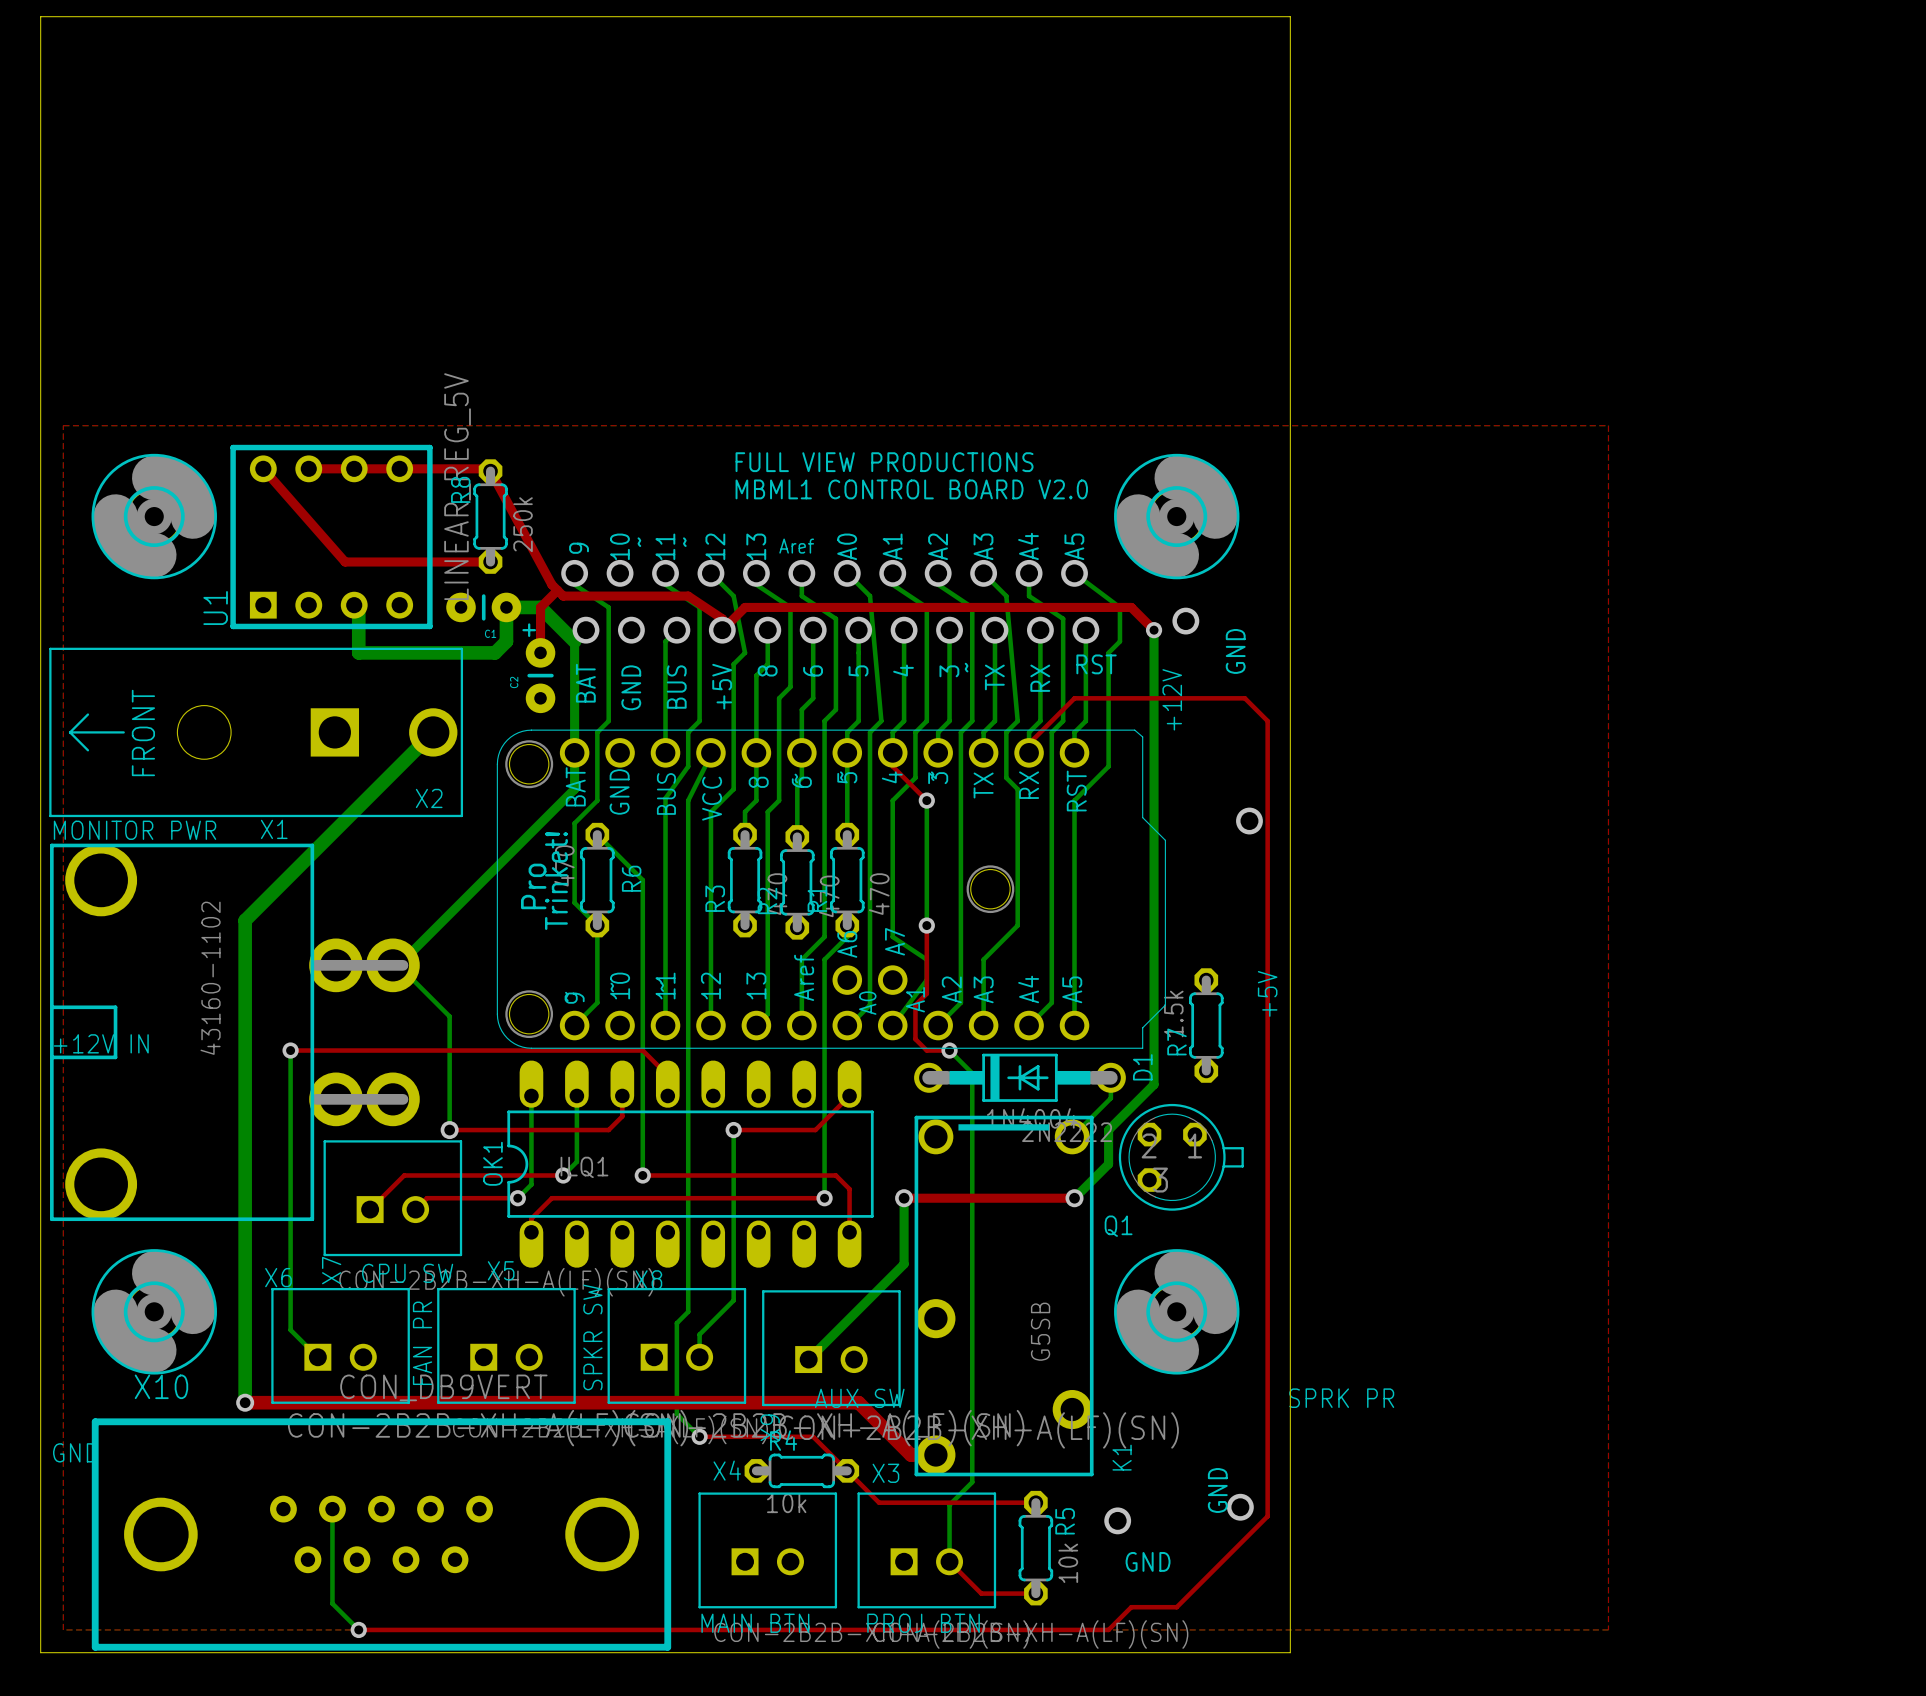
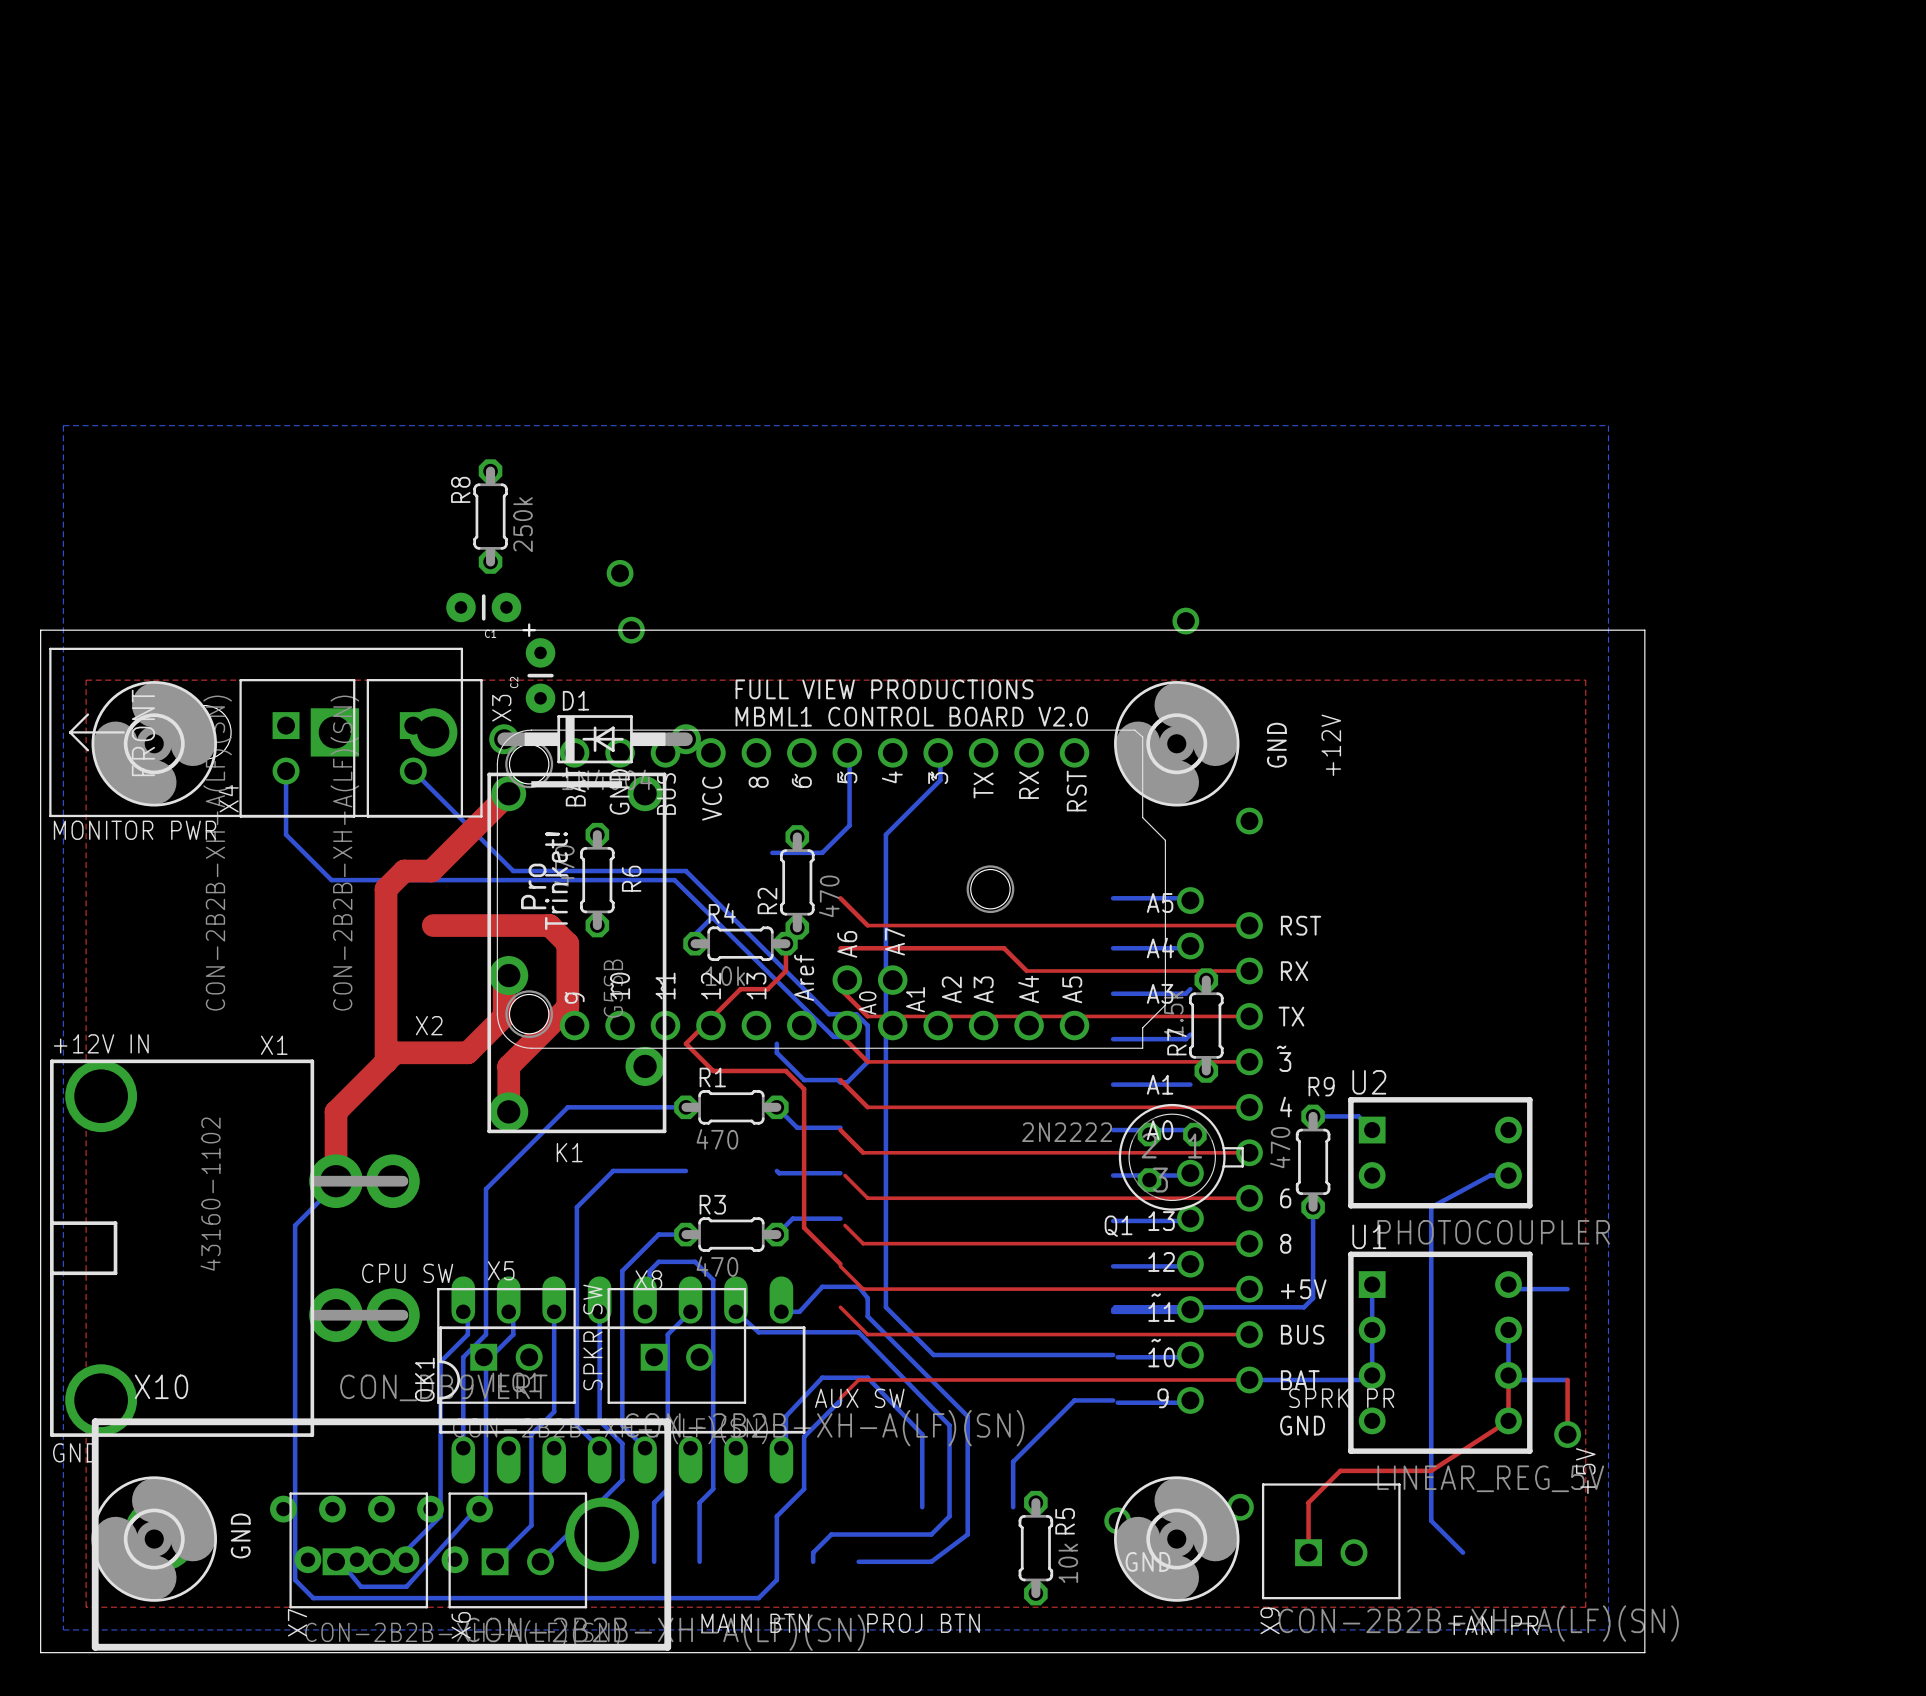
top zone outline: (63, 425) (1608, 425) (1608, 1629) (63, 1629) (63, 425) -> (86, 680) (86, 1607) (1585, 1607) (1585, 680) (86, 680)
text position: FULL VIEW PRODUCTIONS (884, 462) -> FULL VIEW PRODUCTIONS (884, 689)
top track: (263, 468) (345, 562) (490, 562) -> none
top track: (308, 468) (488, 468) (551, 584) (563, 596) (688, 596) (722, 618) (722, 630) (745, 607) (1131, 607) (1154, 630) -> none
text position: MBML1 CONTROL BOARD V2.0 (911, 489) -> MBML1 CONTROL BOARD V2.0 (911, 716)
part position: (154, 516) -> (154, 743)
part position: (1176, 516) -> (1176, 743)
U1 rotation: 0° (331, 537) -> 90° clockwise (1440, 1352)
U1 position: (331, 537) -> (1440, 1352)
text: ~ (639, 542) -> none
text: ~ (684, 542) -> none
text: 10 (619, 546) -> none
text: 11 (665, 546) -> none
text: 12 (715, 546) -> none
text: 13 (756, 546) -> none
text: Aref (796, 546) -> none
text: A0 (847, 546) -> none
text: A1 (892, 546) -> none
text: A2 (938, 546) -> none
text: A3 (983, 546) -> none
text: A4 (1028, 546) -> none
text rotation: 0° (1074, 546) -> 90° clockwise (1160, 902)
text position: A5 (1074, 546) -> A5 (1160, 902)
text: 9 (579, 548) -> none
bottom track: (665, 562) (665, 584) (699, 607) (699, 721) (688, 732) (688, 766) (665, 798) (665, 1025) -> none
bottom track: (574, 573) (574, 584) (608, 607) (608, 721) (597, 732) (597, 800) (574, 823) (574, 902) (597, 925) (597, 1002) (574, 1025) -> none
via: (574, 573) -> none
via: (665, 573) -> none
bottom track: (710, 573) (733, 596) (745, 652) (733, 664) (733, 789) (710, 811) (710, 1025) -> none
via: (710, 573) -> none
bottom track: (756, 573) (756, 584) (790, 607) (790, 686) (779, 698) (779, 800) (767, 811) (767, 1014) (756, 1025) -> none
via: (756, 573) -> none
bottom track: (801, 573) (801, 596) (835, 618) (835, 709) (824, 721) (824, 936) (801, 959) (801, 1025) -> none
via: (801, 573) -> none
bottom track: (847, 573) (870, 596) (881, 721) (870, 732) (870, 1005) (849, 1025) (847, 1025) -> none
via: (847, 573) -> none
bottom track: (892, 573) (892, 584) (926, 607) (926, 721) (915, 732) (915, 777) (892, 800) (892, 936) (926, 959) (926, 980) (892, 1025) -> none
via: (892, 573) -> none
bottom track: (938, 573) (938, 584) (972, 607) (972, 721) (960, 732) (960, 1002) (938, 1025) -> none
via: (938, 573) -> none
bottom track: (983, 573) (1006, 596) (1017, 721) (1006, 732) (1006, 777) (1017, 789) (1017, 925) (983, 959) (983, 1025) -> none
via: (983, 573) -> none
bottom track: (1029, 573) (1029, 596) (1063, 618) (1063, 721) (1051, 732) (1051, 1002) (1029, 1025) -> none
via: (1029, 573) -> none
bottom track: (1074, 573) (1119, 607) (1119, 641) (1108, 652) (1108, 766) (1074, 800) (1074, 1025) -> none
via: (1074, 573) -> none
top track: (557, 590) (540, 607) (540, 652) -> none
bottom track: (354, 605) (358, 609) (358, 652) (495, 652) (506, 641) (506, 607) (540, 607) (574, 641) -> none
board edge: (40, 630) (40, 16) (1290, 16) (1290, 1652) -> (40, 630) (1644, 630) (1644, 1652) (1290, 1652)
via: (585, 630) -> none
bottom track: (676, 630) (665, 641) (665, 752) -> none
via: (676, 630) -> none
via: (722, 630) -> none
bottom track: (767, 630) (767, 664) (756, 675) (756, 800) (745, 811) (745, 834) -> none
via: (767, 630) -> none
bottom track: (813, 630) (813, 698) (801, 709) (801, 777) (797, 782) (797, 836) -> none
via: (813, 630) -> none
bottom track: (858, 630) (858, 721) (847, 732) (847, 834) -> none
via: (858, 630) -> none
bottom track: (904, 630) (904, 721) (892, 732) (892, 752) -> none
via: (904, 630) -> none
bottom track: (949, 630) (949, 721) (938, 732) (938, 752) -> none
via: (949, 630) -> none
bottom track: (994, 630) (994, 721) (983, 732) (983, 752) -> none
via: (994, 630) -> none
bottom track: (1040, 630) (1040, 721) (1029, 732) (1029, 752) -> none
via: (1040, 630) -> none
bottom track: (1085, 630) (1085, 721) (1074, 732) (1074, 752) -> none
via: (1085, 630) -> none
bottom track: (1154, 630) (1154, 1084) (1108, 1130) (1108, 1164) (1074, 1198) -> none
via: (1154, 630) -> none
bottom track: (574, 641) (574, 789) (398, 965) -> none
text position: GND (1235, 651) -> GND (1276, 745)
text position: RST (1096, 664) -> RST (1301, 925)
text: ~ (966, 667) -> none
text: 8 (767, 670) -> none
text: 6 (813, 670) -> none
text: 5 (858, 670) -> none
text: 4 (903, 670) -> none
text: 3 (949, 671) -> none
text: TX (994, 677) -> none
text rotation: 0° (1040, 678) -> 90° clockwise (1294, 971)
text position: RX (1040, 678) -> RX (1294, 971)
text: BAT (585, 683) -> none
text: +5V (722, 686) -> none
text: GND (631, 687) -> none
text: BUS (676, 687) -> none
text position: +12V (1172, 699) -> +12V (1331, 745)
bottom track: (433, 732) (245, 920) (245, 1402) -> none
bottom track: (710, 752) (688, 800) (688, 1311) (676, 1323) (676, 1414) (699, 1436) -> none
top track: (892, 752) (892, 766) (926, 800) -> none
top track: (1029, 752) (1029, 743) (1074, 698) (1244, 698) (1267, 721) (1267, 1516) (1176, 1607) (1131, 1607) (1108, 1629) (358, 1629) -> none
bottom track: none -> (849, 761) (849, 825) (822, 852) (772, 852)
bottom track: none -> (940, 761) (940, 780) (885, 834) (885, 1307) (933, 1355) (1113, 1355)
bottom track: none -> (286, 771) (286, 834) (331, 880) (674, 880) (833, 1036) (840, 1036)
bottom track: none -> (413, 771) (513, 871) (685, 871) (829, 1014) (856, 1014) (867, 1025) (867, 1061) (847, 1082) (840, 1082) (838, 1080) (804, 1080) (776, 1052) (776, 1043)
top track: none -> (508, 793) (431, 871) (404, 871) (386, 889) (386, 1061)
text position: X2 (429, 798) -> X2 (429, 1025)
bottom track: (926, 800) (926, 925) -> none
via: (926, 800) -> none
bottom track: (597, 834) (642, 880) (642, 1175) -> none
R3 rotation: 0° (745, 880) -> 90° clockwise (731, 1234)
R3 position: (745, 880) -> (731, 1234)
R1 rotation: 0° (847, 880) -> 90° clockwise (731, 1107)
R1 position: (847, 880) -> (731, 1107)
top track: none -> (840, 898) (867, 925) (1249, 925)
bottom track: none -> (1113, 898) (1185, 898) (1190, 902)
via: none -> (1190, 900)
bottom track: none -> (712, 917) (695, 934) (695, 943)
top track: none -> (433, 925) (549, 925) (567, 943) (567, 1007) (508, 1066) (508, 1111)
bottom track: (847, 925) (847, 936) (824, 959) (824, 1198) -> none
top track: (926, 925) (926, 993) (915, 1005) (915, 1039) (926, 1050) (949, 1050) -> none
via: (926, 925) -> none
via: none -> (1249, 925)
top track: none -> (785, 943) (785, 971) (767, 989) (740, 989) (685, 1043) (713, 1070) (785, 1070) (804, 1089) (804, 1227) (840, 1264)
bottom track: none -> (1190, 943) (1185, 948) (1113, 948)
via: none -> (1190, 946)
text: none -> A4 (1160, 947)
top track: none -> (840, 948) (1004, 948) (1026, 971) (1249, 971)
bottom track: (398, 965) (449, 1016) (449, 1130) -> none
via: none -> (1249, 971)
top track: none -> (508, 975) (504, 980) (504, 1016) (467, 1052) (395, 1052) (336, 1111) (336, 1181)
top track: none -> (840, 989) (867, 1016) (1249, 1016)
bottom track: none -> (1190, 989) (1185, 993) (1113, 993)
text: none -> A3 (1160, 993)
text rotation: 0° (1267, 993) -> 90° clockwise (1303, 1289)
text position: +5V (1267, 993) -> +5V (1303, 1289)
via: none -> (1249, 1016)
text: none -> TX (1291, 1016)
X1 position: (234, 1032) -> (234, 1248)
top track: none -> (840, 1034) (867, 1061) (1249, 1061)
bottom track: none -> (1190, 1034) (1185, 1039) (1113, 1039)
text: none -> ~ (1281, 1047)
bottom track: (290, 1050) (290, 1330) (317, 1357) -> none
top track: (290, 1050) (642, 1050) (667, 1075) (667, 1095) -> none
via: (290, 1050) -> none
bottom track: (949, 1050) (972, 1073) (972, 1482) (949, 1504) -> (735, 1311) (758, 1332) (858, 1332) (949, 1425) (949, 1504)
via: (949, 1050) -> none
via: none -> (1249, 1061)
text: none -> 3 (1285, 1062)
D1 name rotation: 0° (1142, 1067) -> 90° clockwise (576, 700)
D1 name position: D1 (1142, 1067) -> D1 (576, 700)
D1 position: (1019, 1077) -> (595, 739)
bottom track: (1110, 1077) (1110, 1098) (1072, 1136) -> none
top track: none -> (840, 1080) (867, 1107) (1249, 1107)
bottom track: none -> (1113, 1084) (1190, 1084)
text: none -> A1 (1160, 1084)
bottom track: (531, 1095) (531, 1184) (517, 1198) -> none
bottom track: (576, 1095) (576, 1161) (563, 1175) -> none
top track: (622, 1095) (622, 1116) (608, 1130) (449, 1130) -> none
top track: (849, 1095) (815, 1130) (733, 1130) -> none
bottom track: none -> (685, 1107) (567, 1107) (486, 1189) (486, 1334) (463, 1357) (463, 1448)
bottom track: none -> (776, 1107) (797, 1127) (840, 1127)
via: none -> (1249, 1107)
text: none -> 4 (1286, 1107)
bottom track: none -> (1313, 1116) (1358, 1116) (1372, 1130)
via: (449, 1130) -> none
bottom track: (733, 1130) (733, 1300) (699, 1334) (699, 1357) -> none
via: (733, 1130) -> none
top track: none -> (840, 1130) (863, 1152) (1249, 1152)
bottom track: none -> (1113, 1130) (1190, 1130)
text: none -> A0 (1160, 1130)
via: none -> (1249, 1152)
U2: none -> PHOTOCOUPLER (1440, 1152)
R9: none -> 470 (1313, 1161)
OK1 position: (690, 1164) -> (622, 1380)
bottom track: none -> (685, 1170) (613, 1170) (576, 1207) (576, 1425) (599, 1448)
bottom track: none -> (776, 1170) (779, 1173) (840, 1173)
via: none -> (1190, 1173)
top track: (563, 1175) (404, 1175) (370, 1209) -> none
via: (563, 1175) -> none
top track: (642, 1175) (835, 1175) (849, 1189) (849, 1232) -> none
via: (642, 1175) -> none
top track: none -> (845, 1175) (867, 1198) (904, 1198)
bottom track: none -> (1113, 1175) (1190, 1175)
bottom track: none -> (1508, 1175) (1490, 1175) (1431, 1207) (1431, 1520) (1463, 1552)
bottom track: none -> (336, 1181) (339, 1181) (295, 1225) (295, 1579) (313, 1598) (758, 1598) (776, 1579) (776, 1516) (804, 1489) (804, 1436) (840, 1400)
X7 position: (392, 1198) -> (358, 1550)
top track: (517, 1198) (426, 1198) (415, 1209) -> none
via: (517, 1198) -> none
top track: (824, 1198) (551, 1198) (531, 1218) (531, 1232) -> none
via: (824, 1198) -> none
bottom track: (904, 1198) (904, 1264) (808, 1359) -> none
top track width: thick (904, 1198) (1074, 1198) -> thin (904, 1198) (1074, 1198)
via: (904, 1198) -> none
top track: none -> (1074, 1198) (1249, 1198)
via: (1074, 1198) -> none
via: none -> (1249, 1198)
text: none -> 6 (1285, 1198)
bottom track: none -> (1313, 1207) (1313, 1298) (1304, 1307) (1115, 1307) (1113, 1309)
bottom track: none -> (840, 1218) (792, 1218) (776, 1234)
via: none -> (1190, 1218)
bottom track: none -> (1113, 1220) (1190, 1220)
text: none -> 13 (1161, 1221)
top track: none -> (845, 1225) (863, 1243) (1249, 1243)
bottom track: none -> (685, 1234) (658, 1234) (622, 1270) (622, 1425) (645, 1448)
via: none -> (1249, 1243)
text: none -> 8 (1285, 1243)
text: none -> 12 (1161, 1261)
via: none -> (1190, 1264)
top track: none -> (840, 1266) (863, 1289) (1249, 1289)
bottom track: none -> (1113, 1266) (1190, 1266)
X6 name rotation: 0° (278, 1277) -> 90° counterclockwise (461, 1625)
X6 name position: X6 (278, 1277) -> X6 (461, 1625)
bottom track: none -> (1376, 1280) (1372, 1284) (1372, 1375) (1367, 1380) (1249, 1380)
bottom track: none -> (1508, 1284) (1513, 1289) (1567, 1289)
via: none -> (1249, 1289)
text: none -> ~ (1156, 1295)
K1 position: (1004, 1296) -> (576, 952)
top track: none -> (840, 1307) (867, 1334) (1249, 1334)
via: none -> (1190, 1309)
part position: (154, 1311) -> (154, 1539)
bottom track: none -> (463, 1311) (467, 1316) (467, 1334) (440, 1361) (440, 1516) (395, 1561) (381, 1561)
bottom track: none -> (508, 1311) (513, 1316) (513, 1334) (486, 1361) (486, 1498) (406, 1586) (361, 1586) (340, 1561) (336, 1561)
bottom track: none -> (554, 1311) (554, 1411) (531, 1434) (531, 1525) (495, 1561)
bottom track: none -> (599, 1311) (599, 1420) (622, 1443) (622, 1479) (540, 1561)
bottom track: none -> (645, 1311) (649, 1307) (649, 1270) (658, 1261) (695, 1261) (713, 1280) (713, 1489) (699, 1502) (699, 1561)
bottom track: none -> (690, 1311) (667, 1334) (667, 1489) (654, 1502) (654, 1561)
bottom track: none -> (781, 1311) (799, 1311) (822, 1286) (858, 1286) (867, 1298) (867, 1316) (967, 1416) (967, 1534) (931, 1561) (858, 1561)
bottom track: none -> (1113, 1311) (1190, 1311)
text: none -> 11 (1161, 1311)
part position: (1176, 1311) -> (1176, 1539)
bottom track: none -> (1508, 1330) (1508, 1375) (1513, 1380) (1567, 1380)
via: none -> (1249, 1334)
text: none -> BUS (1302, 1334)
text: none -> ~ (1156, 1340)
text: FAN PR (422, 1343) -> none
X6 position: (340, 1345) -> (517, 1550)
X9 position: (831, 1348) -> (1331, 1541)
bottom track: none -> (1190, 1352) (1185, 1357) (1117, 1357)
via: none -> (1190, 1355)
text: none -> 10 (1161, 1357)
top track: none -> (1508, 1375) (1508, 1420) (1431, 1470) (1340, 1470) (1308, 1502) (1308, 1552)
top track: none -> (1249, 1380) (858, 1380) (840, 1398)
via: none -> (1249, 1380)
text: none -> BAT (1300, 1380)
top track: none -> (1567, 1380) (1567, 1434)
text: none -> 9 (1163, 1398)
bottom track: none -> (1190, 1398) (1185, 1402) (1117, 1402)
bottom track: none -> (1113, 1400) (1074, 1400) (1013, 1461) (1013, 1507)
via: none -> (1190, 1400)
top track: (245, 1402) (858, 1402) (910, 1454) (935, 1454) -> none
via: (245, 1402) -> none
via: none -> (1567, 1434)
top track: (699, 1436) (813, 1436) (879, 1502) (1035, 1502) -> none
via: (699, 1436) -> none
bottom track: none -> (781, 1448) (785, 1443) (785, 1416) (822, 1377) (867, 1377) (922, 1434) (922, 1507)
K1 name rotation: 0° (1122, 1457) -> 90° clockwise (569, 1152)
K1 name position: K1 (1122, 1457) -> K1 (569, 1152)
X4 name position: X4 (727, 1470) -> X4 (228, 798)
R4 position: (801, 1470) -> (740, 943)
text: none -> +5V (1585, 1471)
text rotation: 0° (1217, 1490) -> 90° clockwise (1302, 1425)
text position: GND (1217, 1490) -> GND (1302, 1425)
bottom track: (332, 1509) (332, 1603) (358, 1629) -> none
bottom track: (949, 1516) (949, 1561) -> (949, 1516) (931, 1534) (831, 1534) (813, 1552) (813, 1561)
text: none -> GND (240, 1535)
X4 rotation: 0° (767, 1550) -> 90° clockwise (297, 748)
X4 position: (767, 1550) -> (297, 748)
X3 rotation: 0° (926, 1550) -> 90° clockwise (424, 748)
X3 position: (926, 1550) -> (424, 748)
top track: (949, 1561) (981, 1593) (1035, 1593) -> none
text: none -> FAN PR (1495, 1625)
via: (358, 1629) -> none

